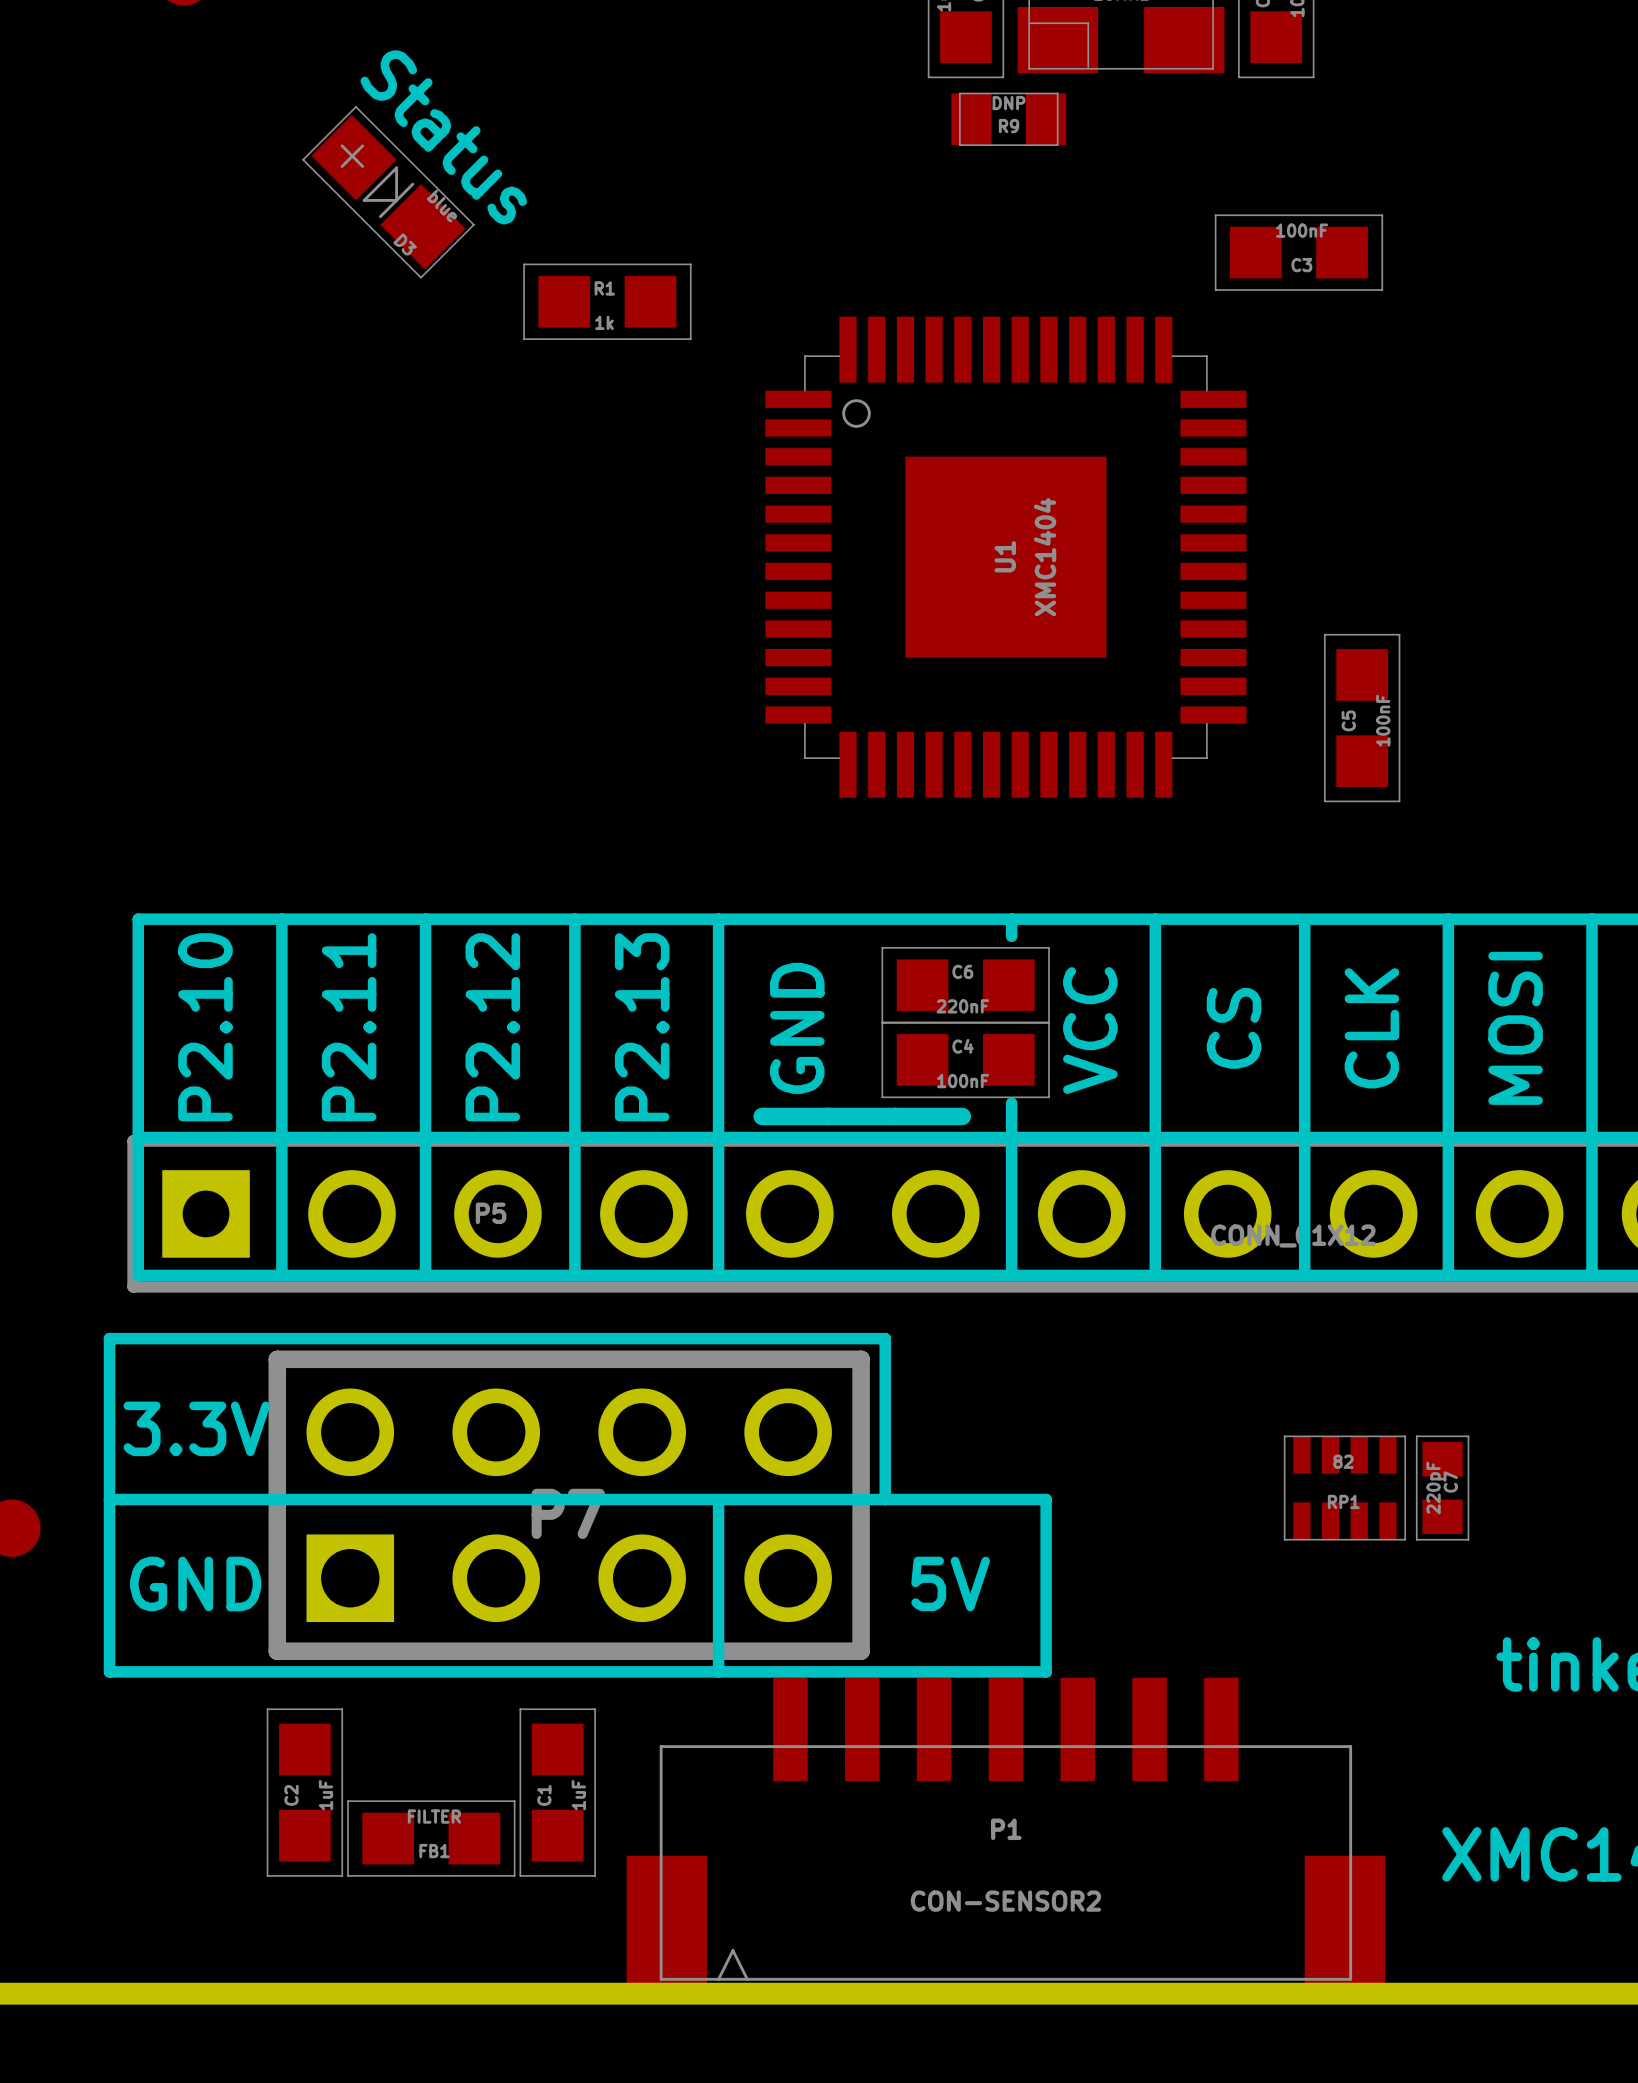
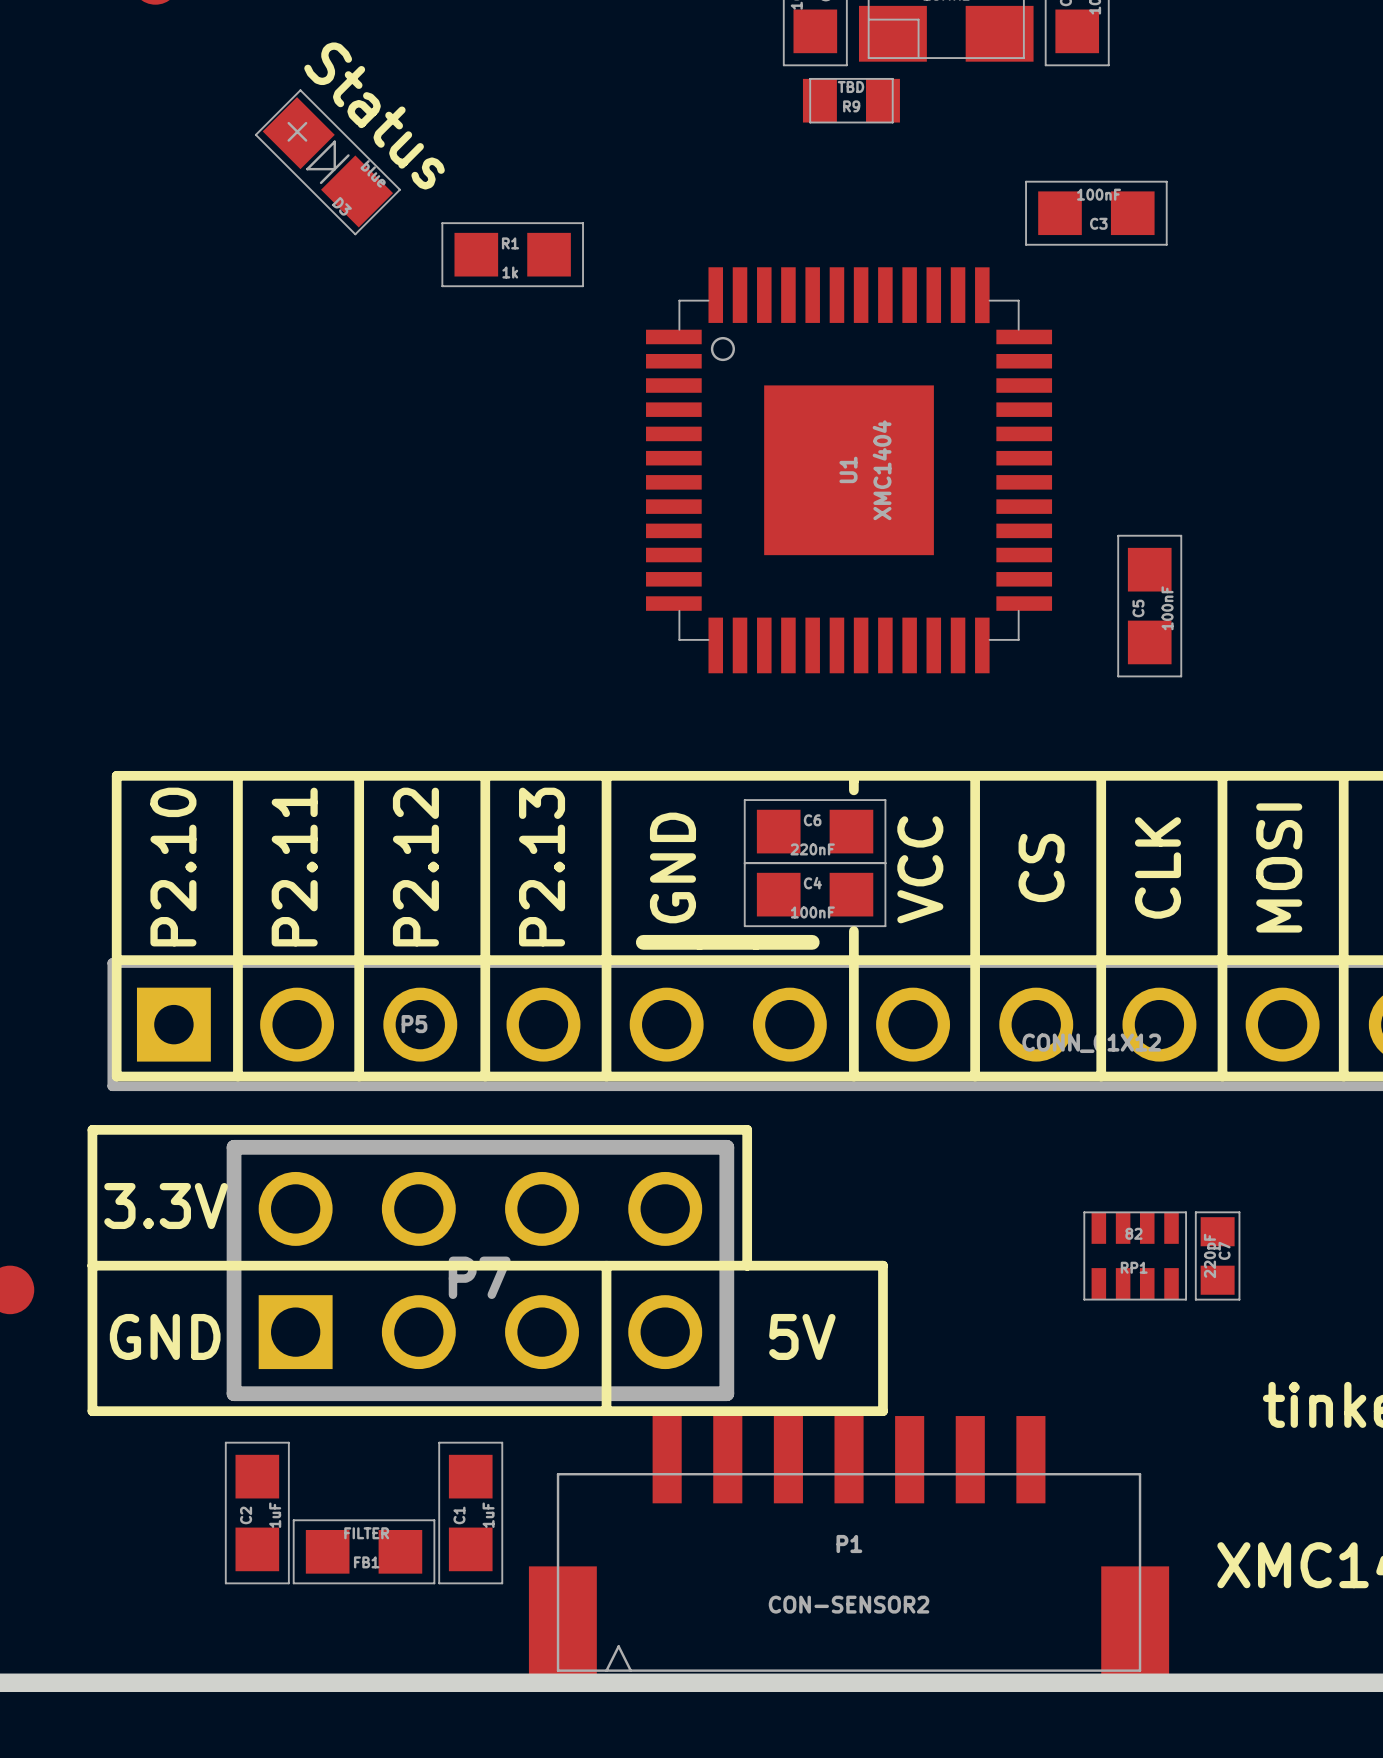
R9 value: DNP (1009, 103) -> TBD (850, 87)

